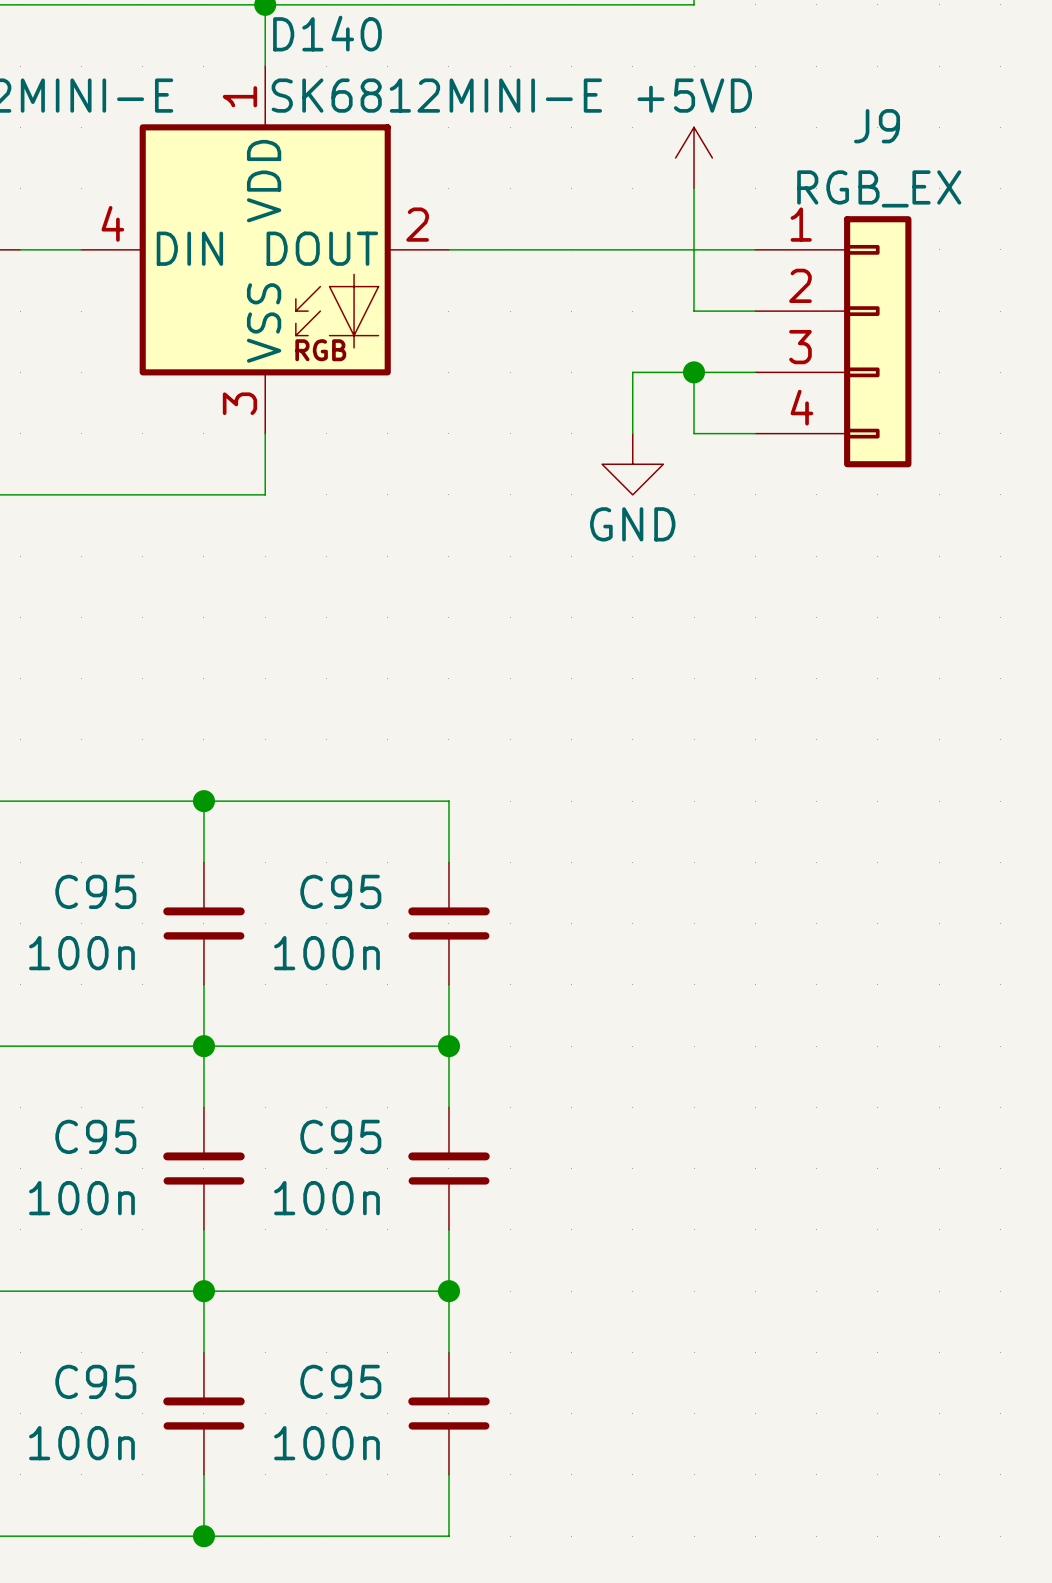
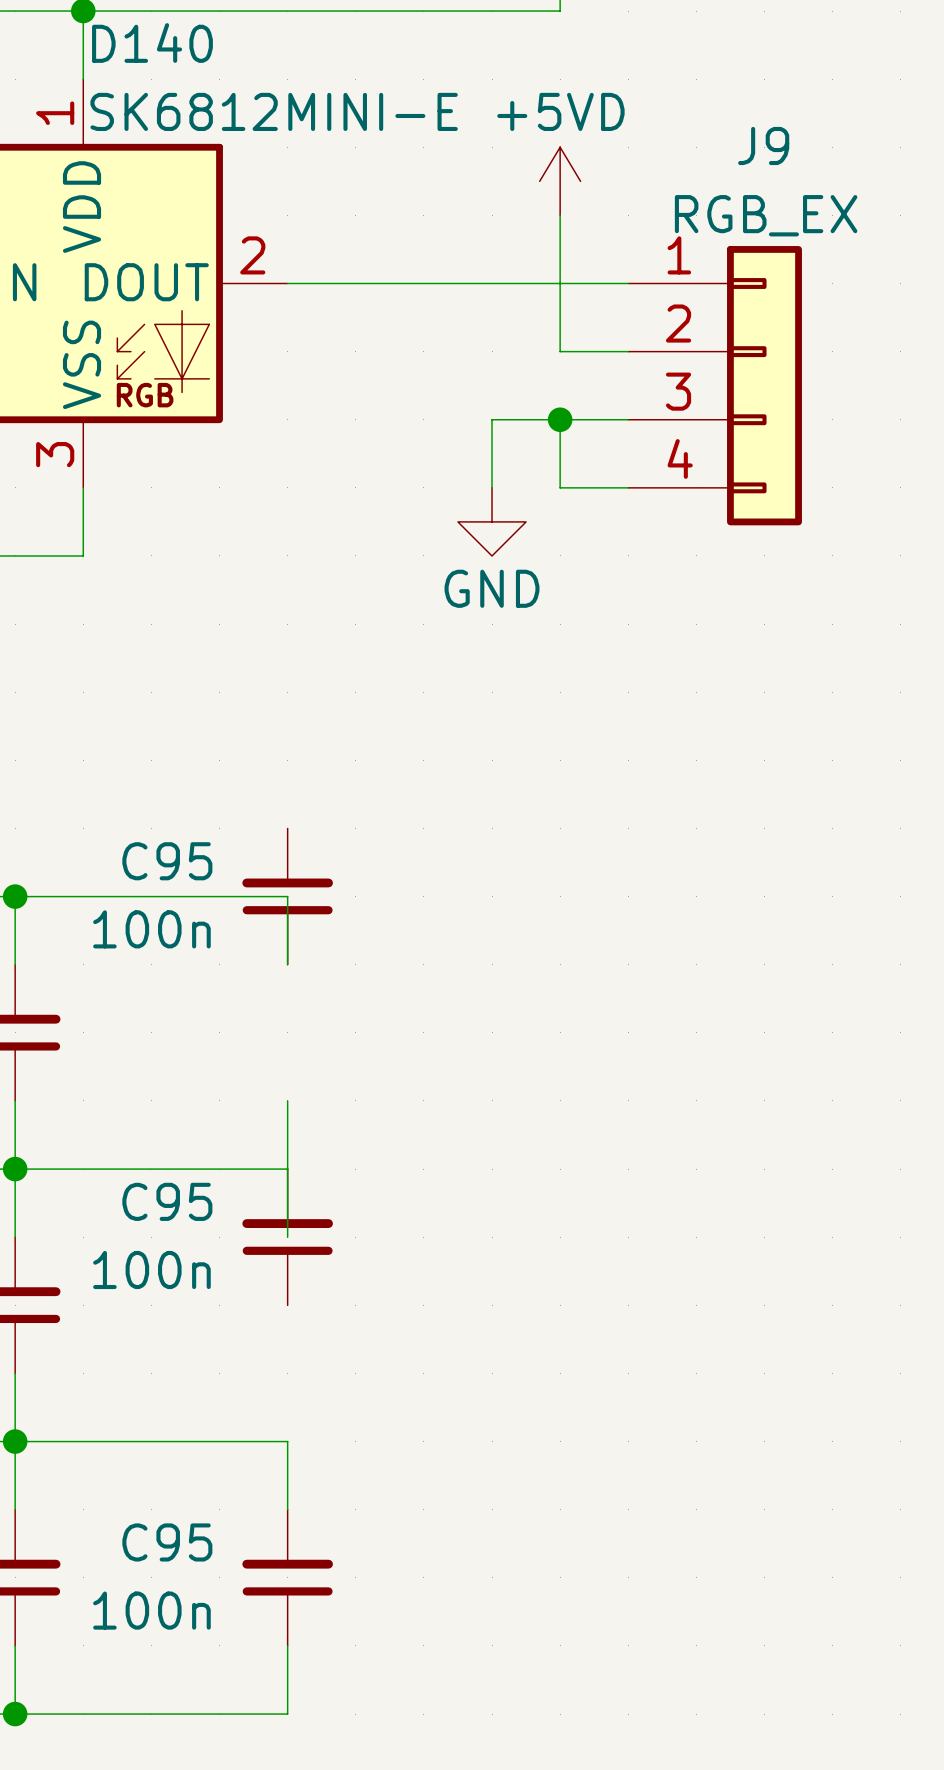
C95: none -> 100n (287, 896)
C95: 100n (448, 923) -> none
junction: (448, 1046) -> none
C95 position: (448, 1168) -> (287, 1237)
wire: (448, 1229) (448, 1291) -> none
junction: (448, 1291) -> none

